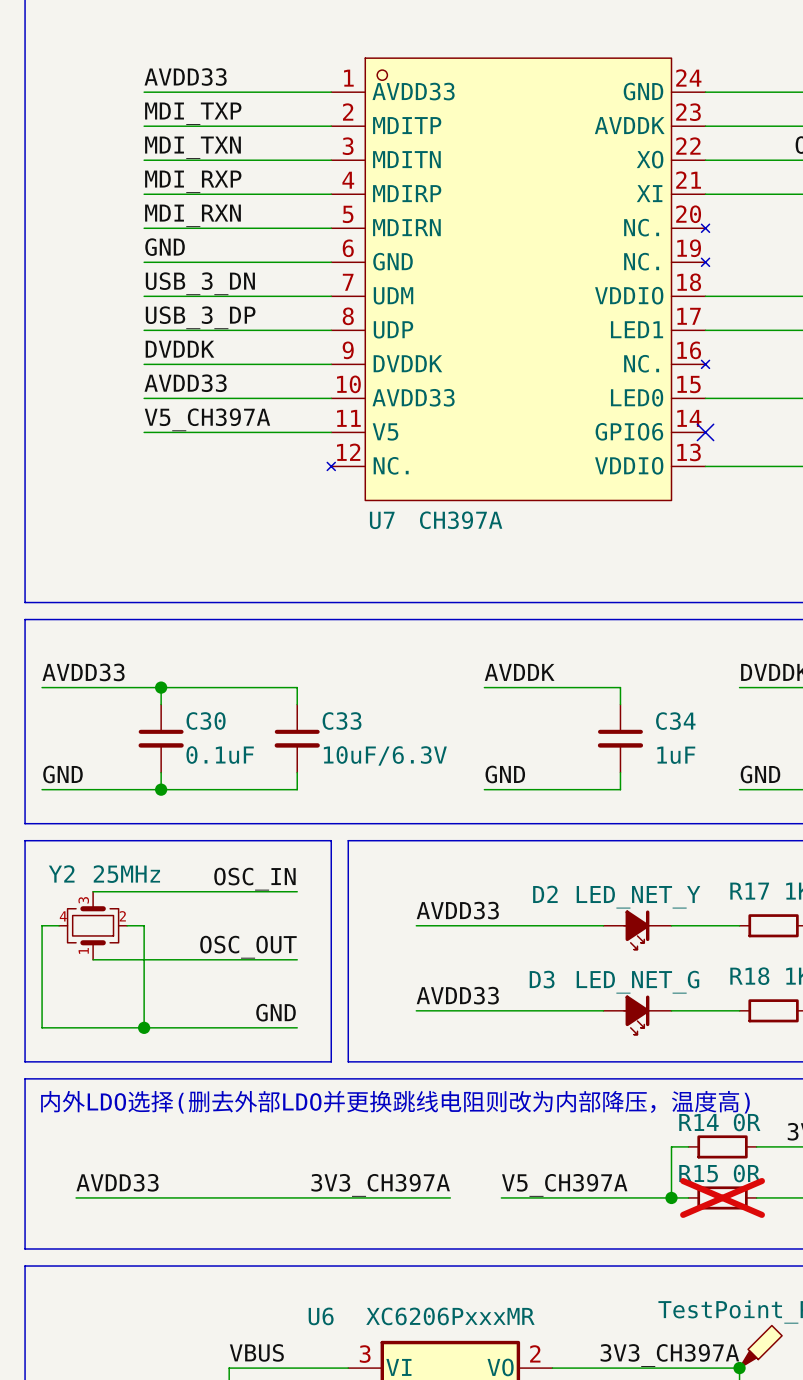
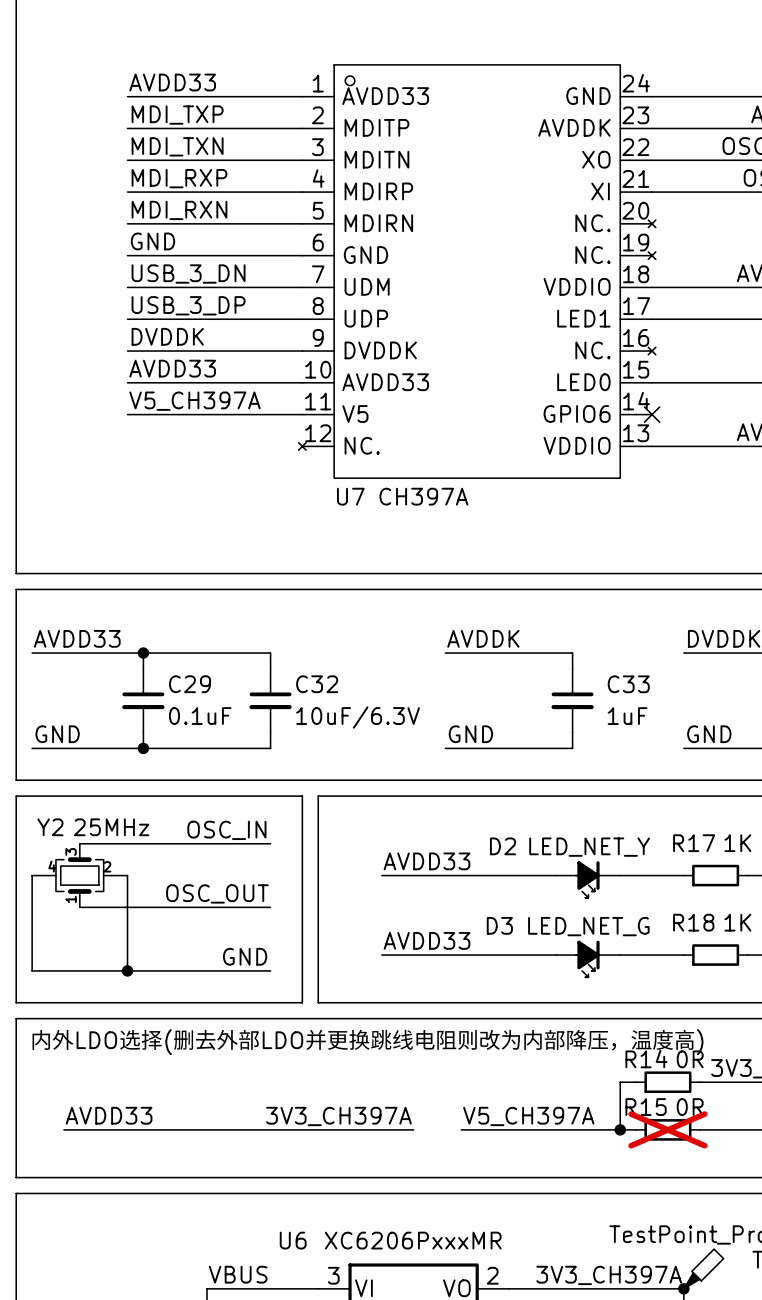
C30 name: C30 (206, 721) -> C29 (189, 684)
C33 name: C33 (342, 721) -> C32 (317, 684)
C34 name: C34 (675, 721) -> C33 (628, 684)

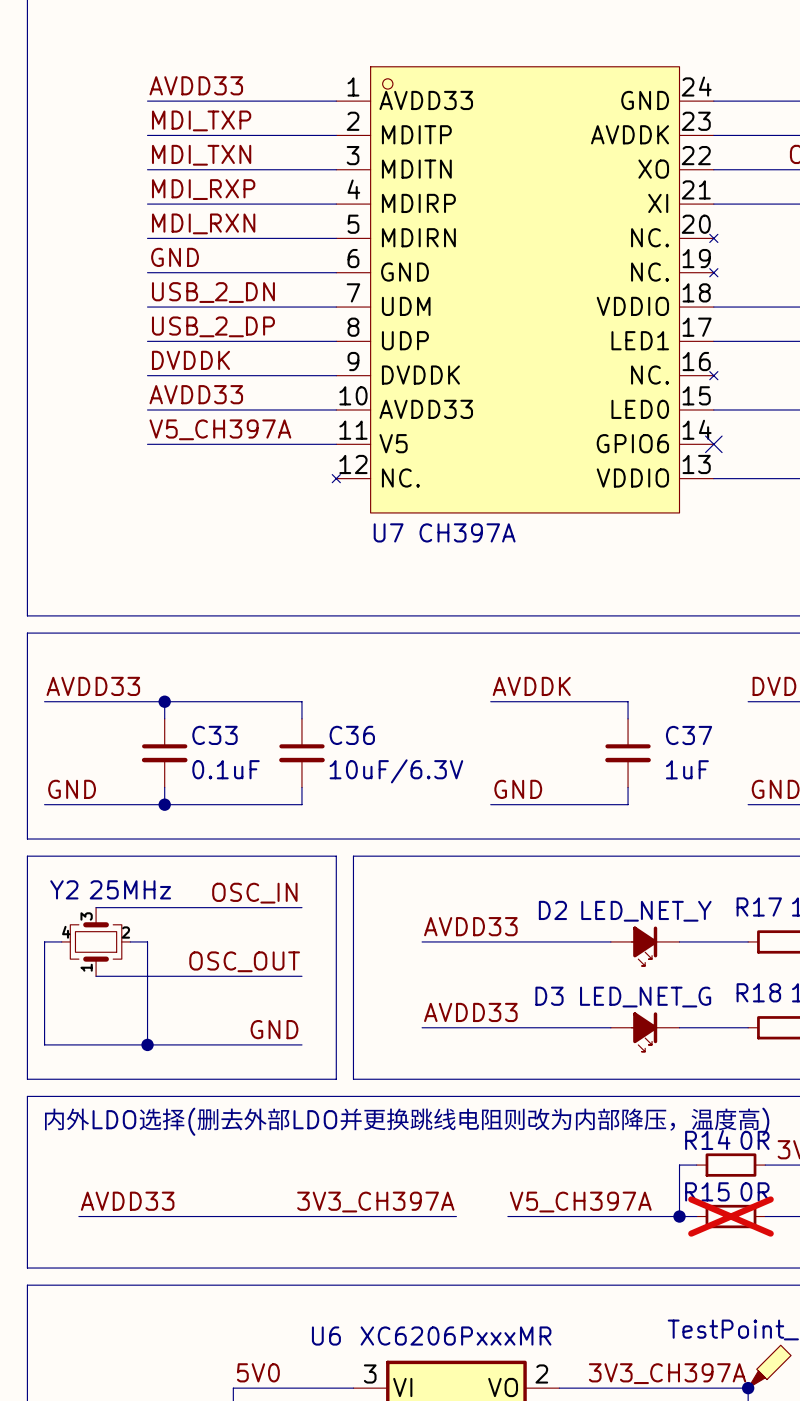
label: USB_3_DN (188, 274) -> USB_2_DN (213, 292)
label: USB_3_DP (188, 305) -> USB_2_DP (213, 326)
C29 name: C29 (189, 684) -> C33 (215, 735)
C32 name: C32 (317, 684) -> C36 (352, 735)
C33 name: C33 (628, 684) -> C37 (689, 735)
label: VBUS (238, 1274) -> 5V0 (258, 1372)

